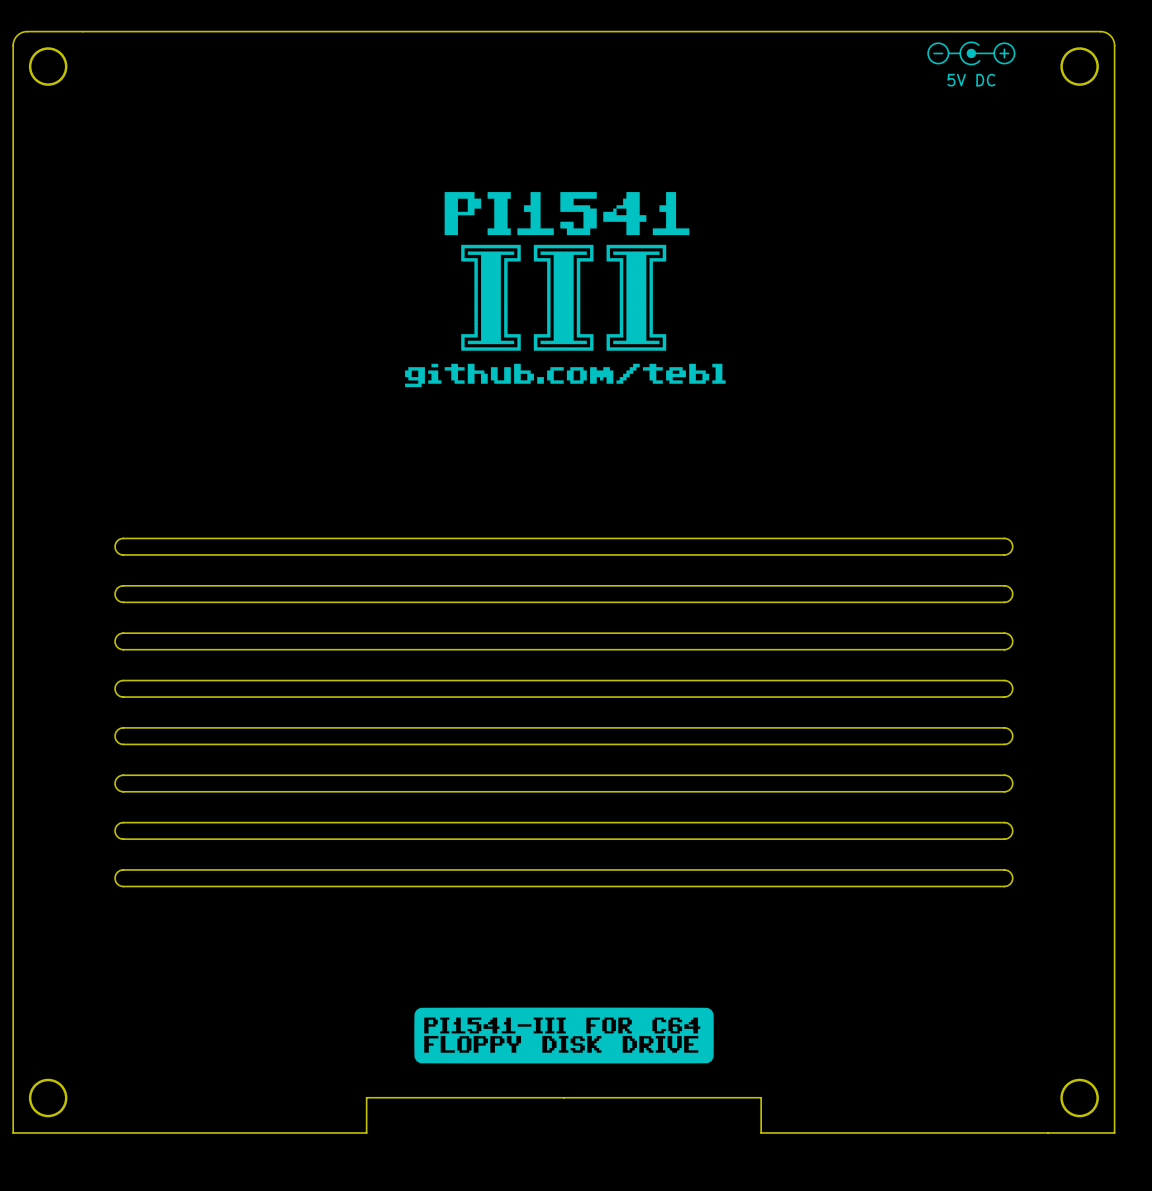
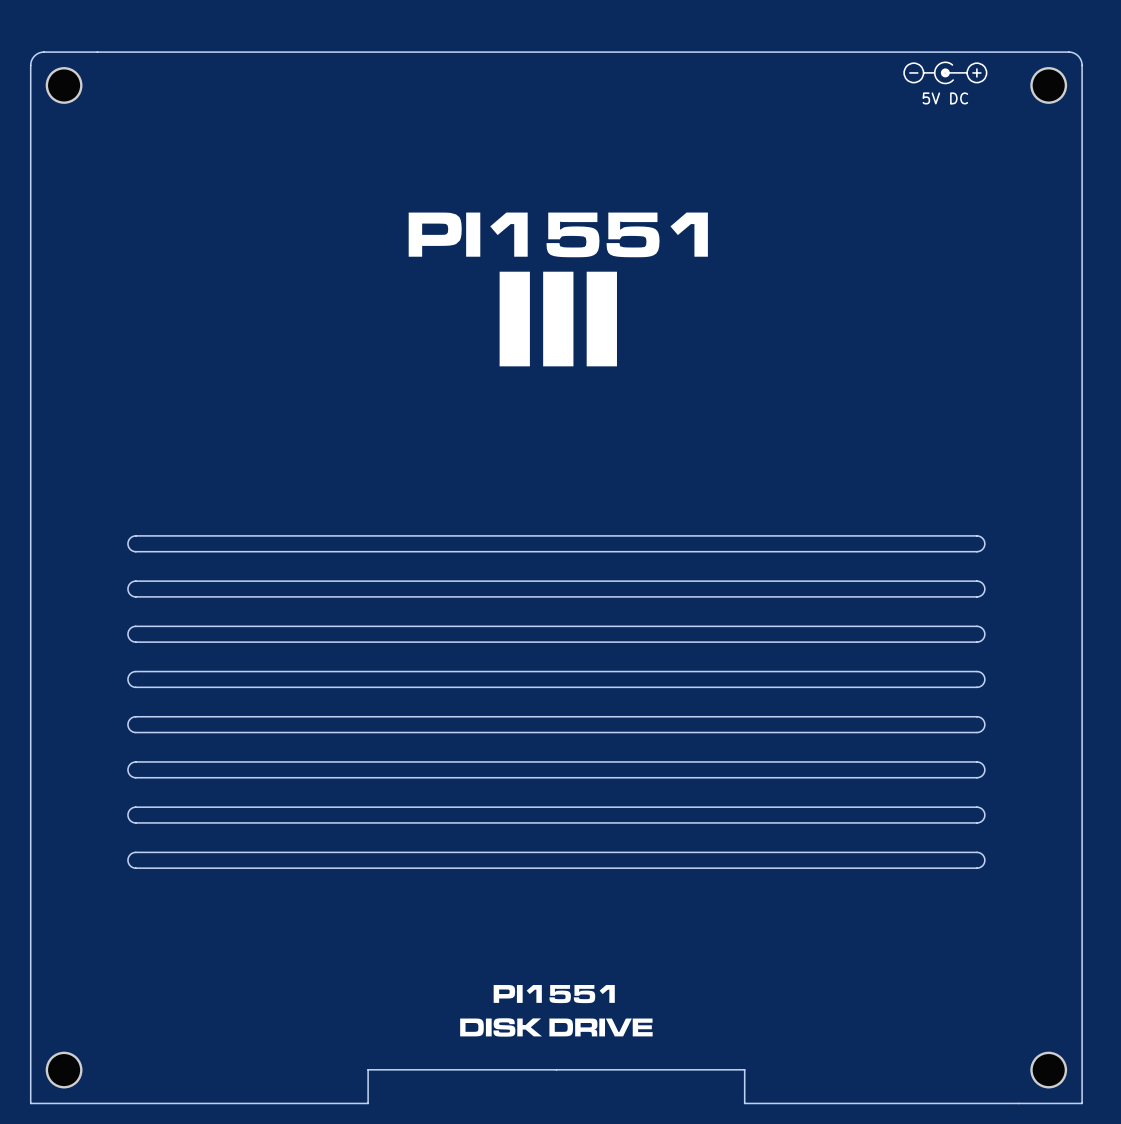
drawing: [405, 192, 726, 388] -> none
drawing: none -> [408, 212, 708, 258]
drawing: none -> [499, 271, 617, 367]
drawing shape: [414, 1007, 714, 1064] -> [460, 985, 653, 1037]

